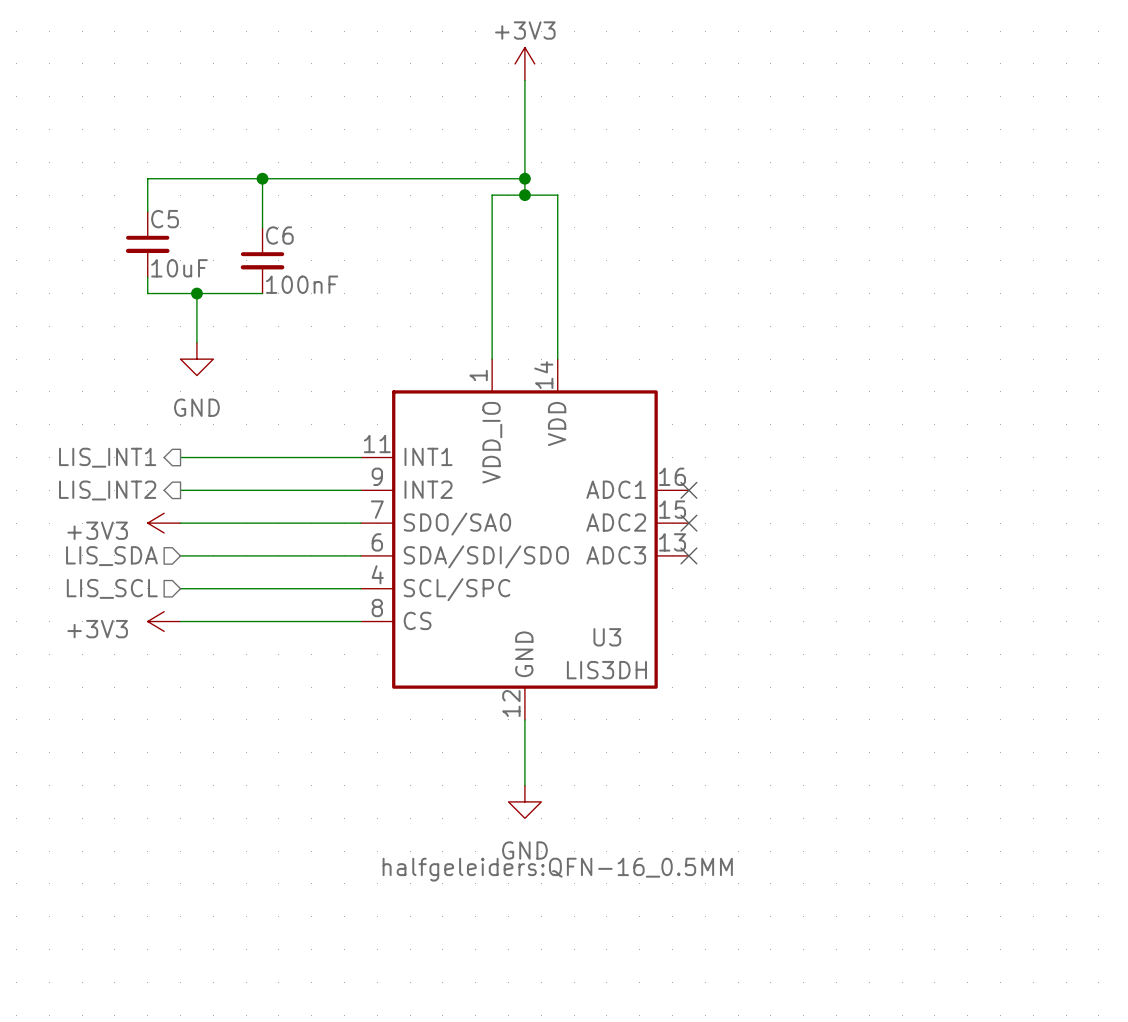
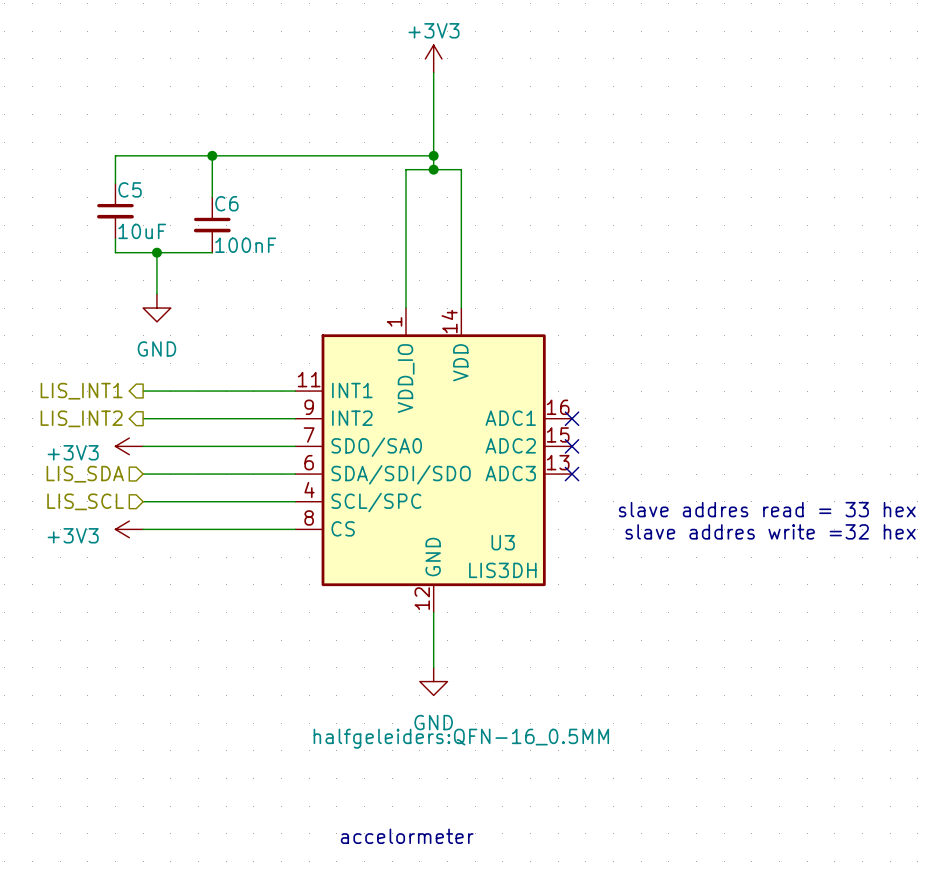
text: none -> slave addres read = 33 hex (767, 509)
text: none -> slave addres write =32 hex (770, 531)
text: none -> accelormeter (407, 836)

